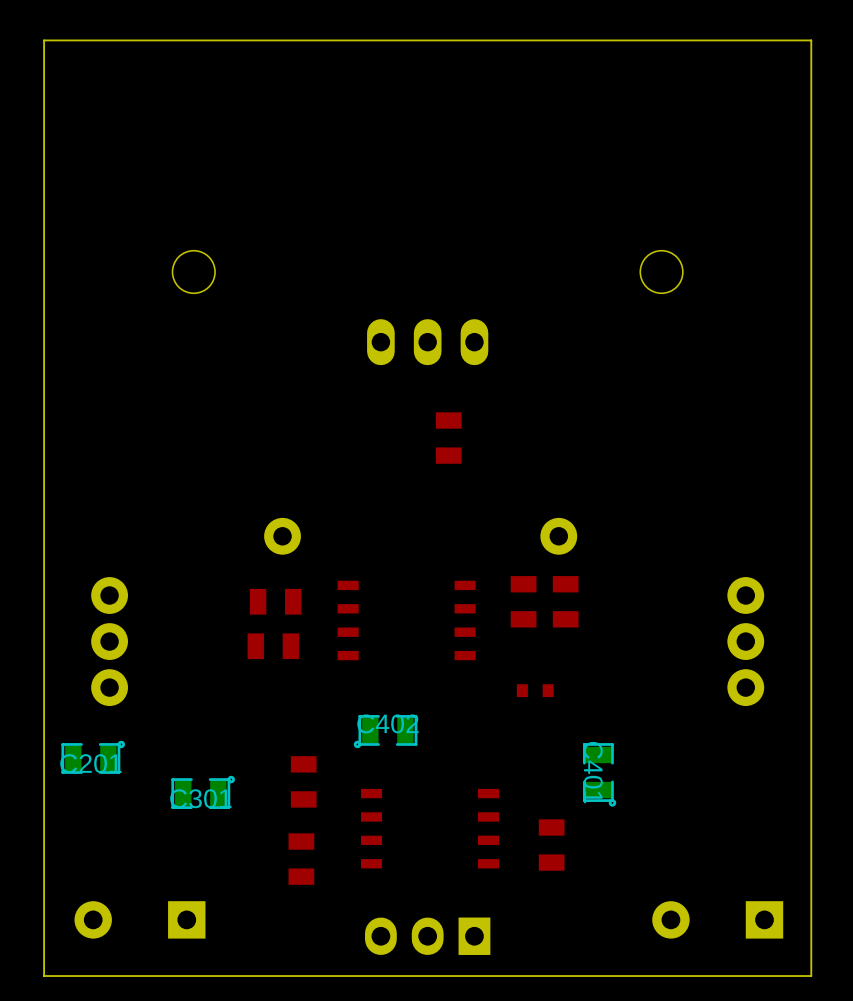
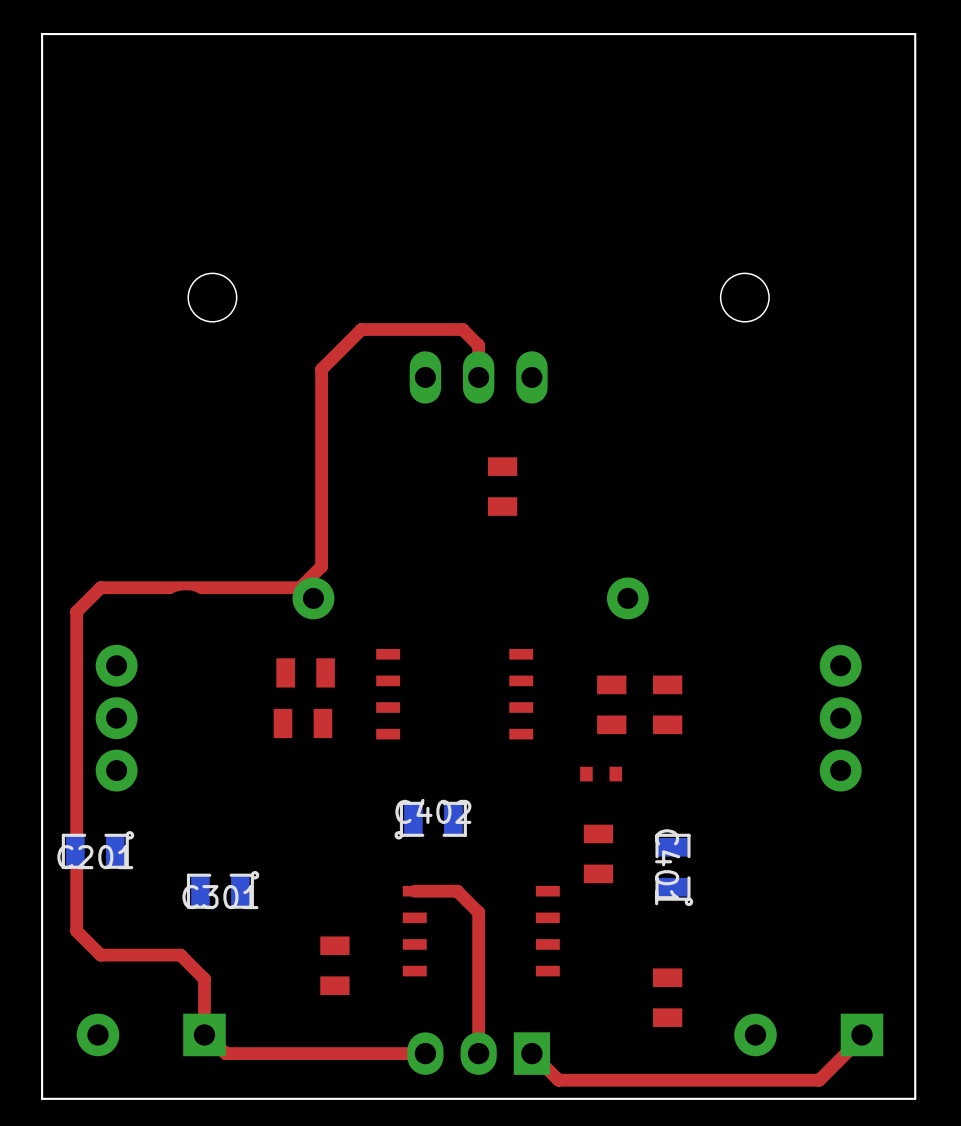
top track: none -> (478, 377) (478, 345) (462, 329) (361, 329) (321, 369) (321, 566) (300, 587) (100, 587) (76, 611) (76, 931) (100, 955) (180, 955) (204, 979) (204, 1034) (207, 1034) (225, 1053) (425, 1053)
part: (523, 601) -> none
part: (565, 601) -> none
part: none -> (611, 704)
part: none -> (667, 704)
part: none -> (598, 853)
part: (303, 781) -> none
top track: none -> (414, 891) (457, 891) (478, 912) (478, 1053)
part: (551, 845) -> none
part: none -> (667, 997)
top track: none -> (861, 1034) (861, 1037) (819, 1080) (558, 1080) (531, 1053)

